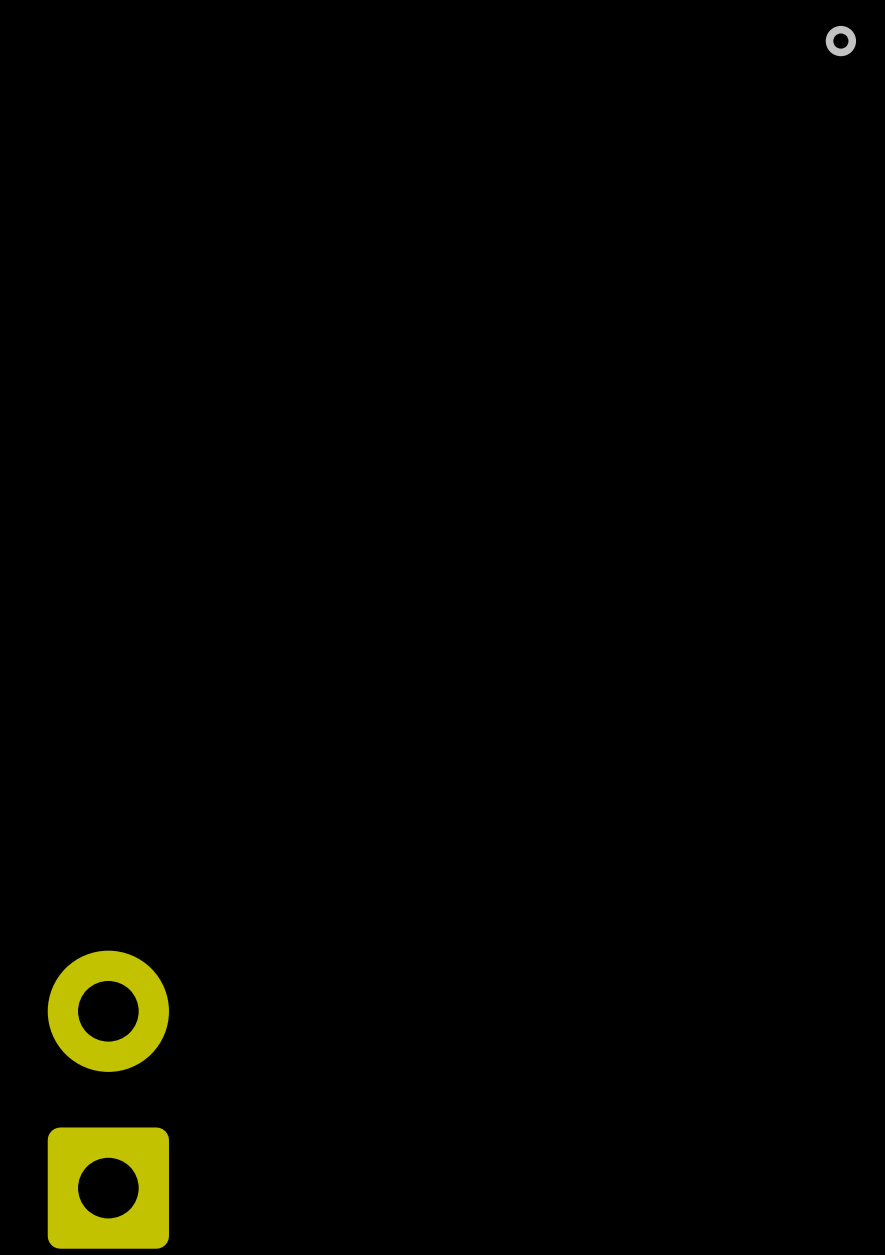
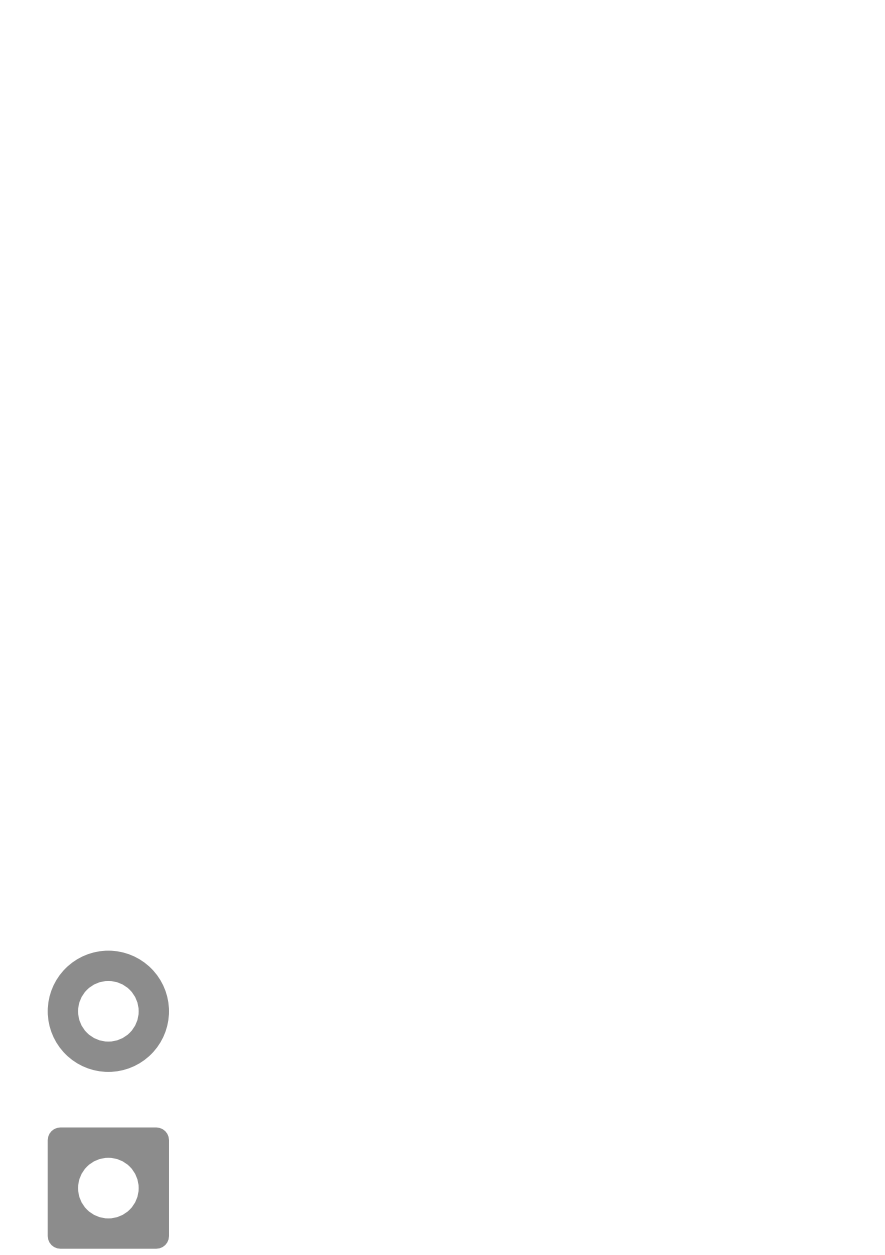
via: (840, 41) -> none

